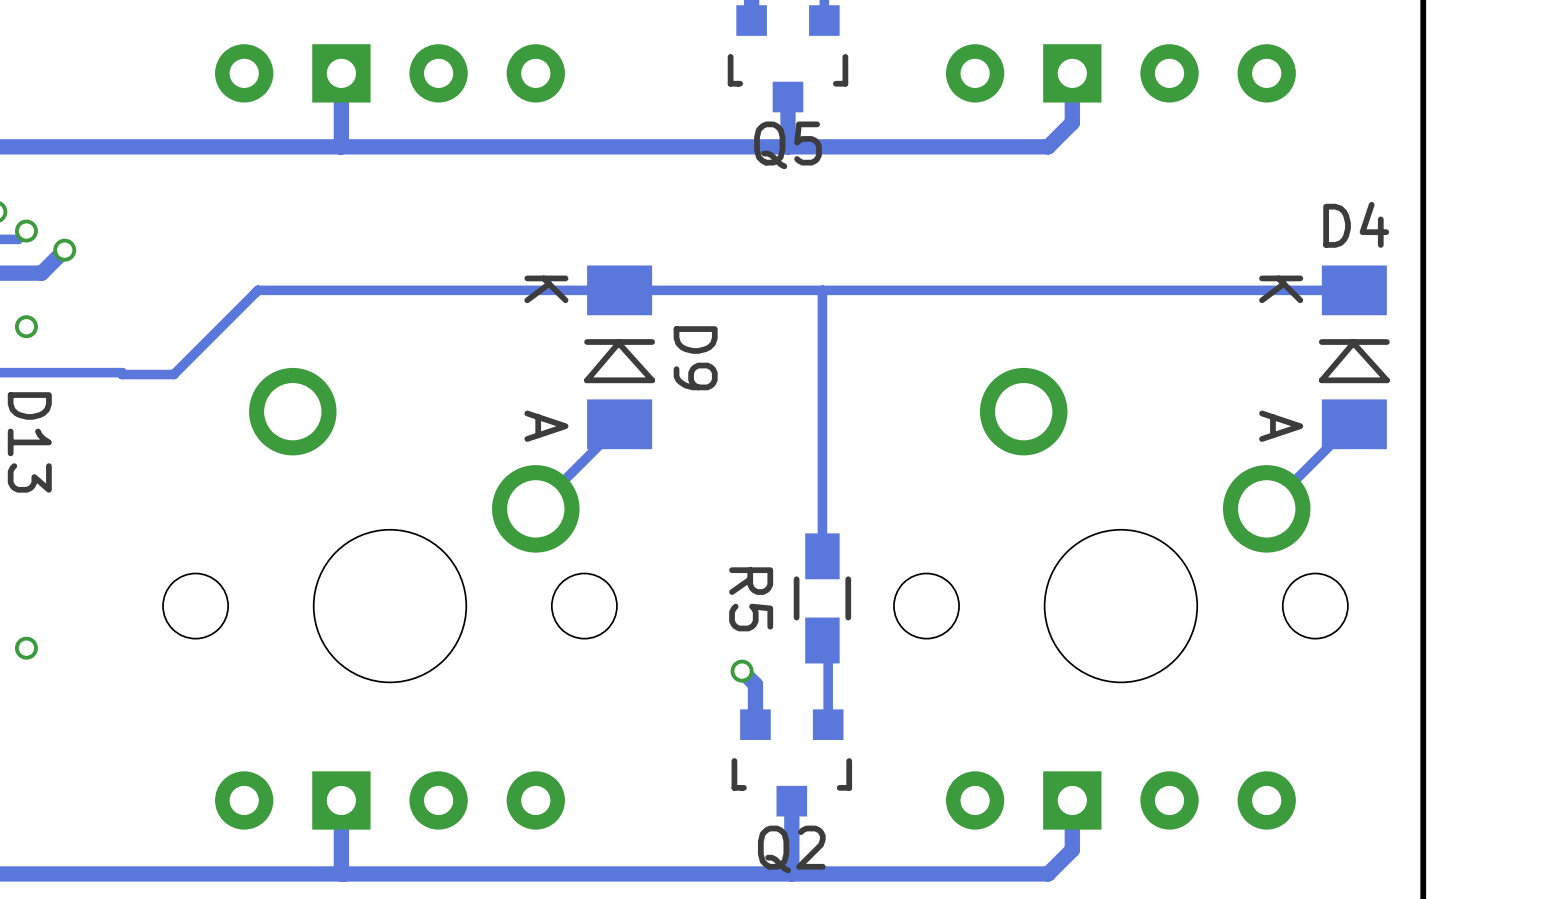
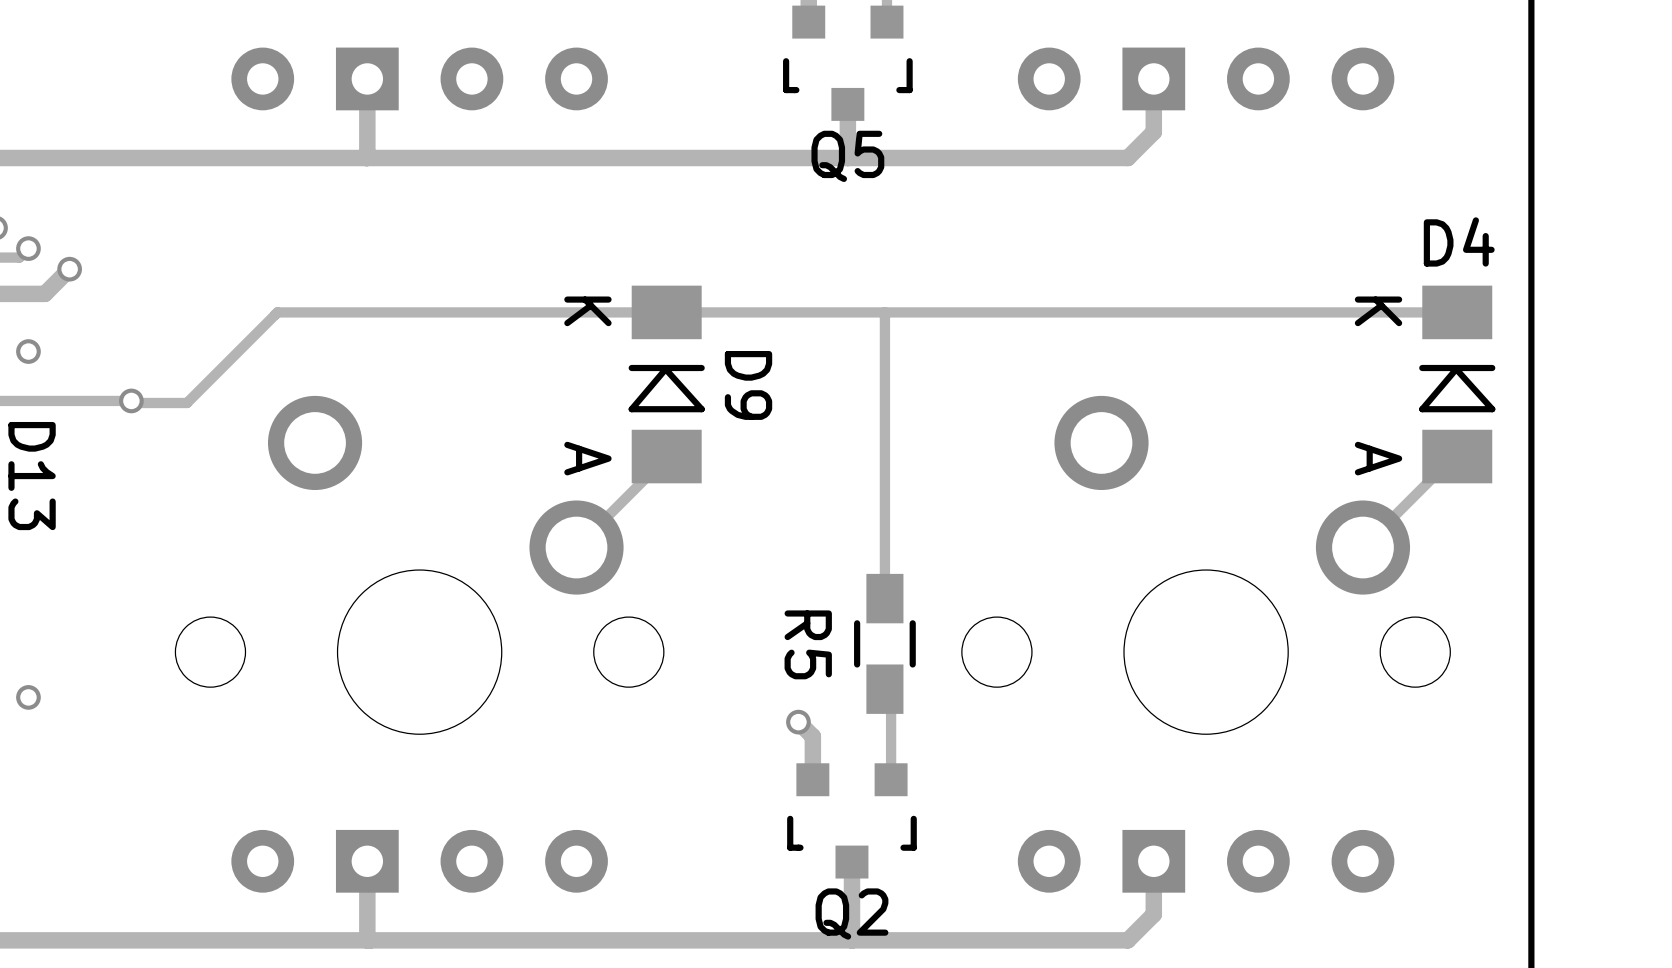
via: none -> (131, 400)

